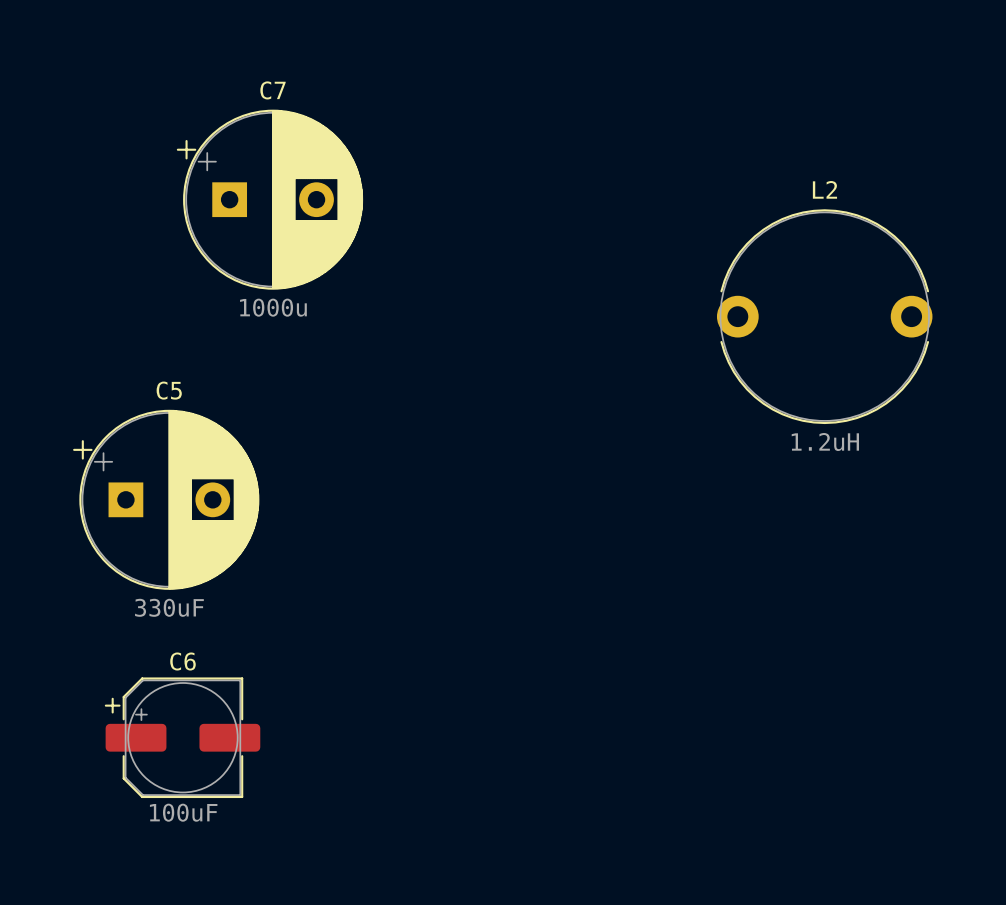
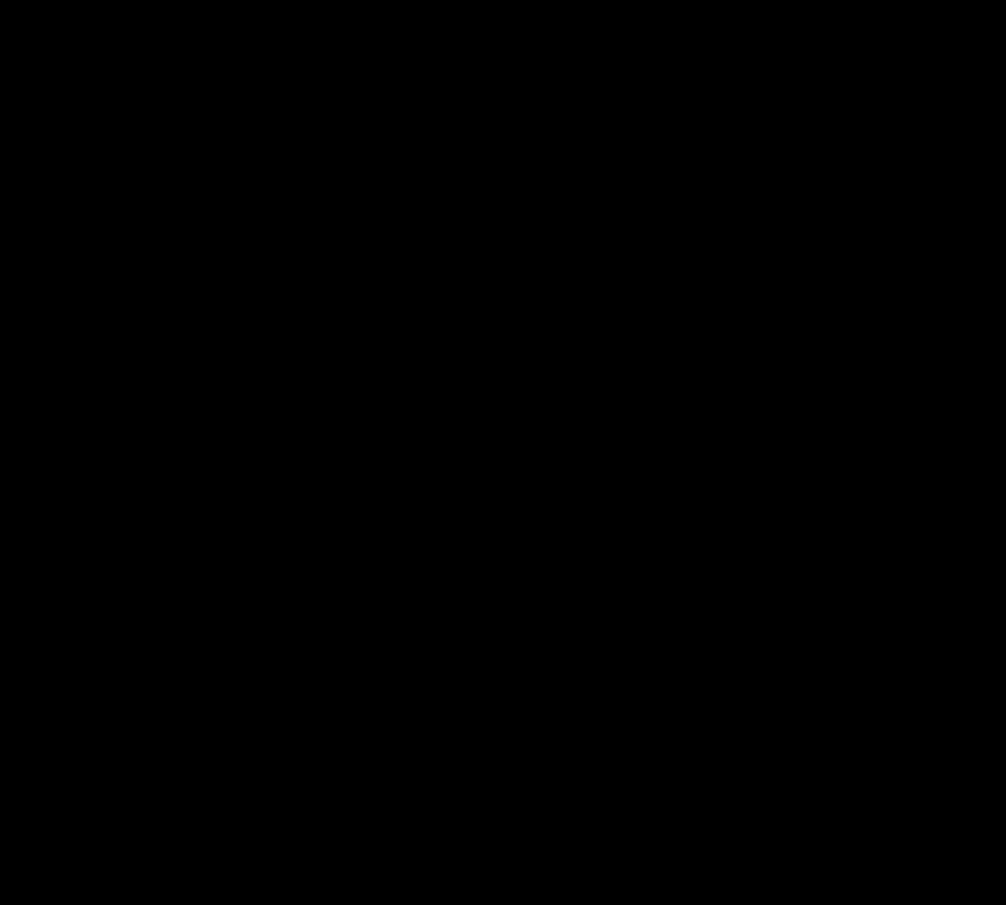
C7: 1000u (269, 199) -> none
L2: 1.2uH (824, 316) -> none
C5: 330uF (166, 499) -> none
C6: 100uF (182, 737) -> none

